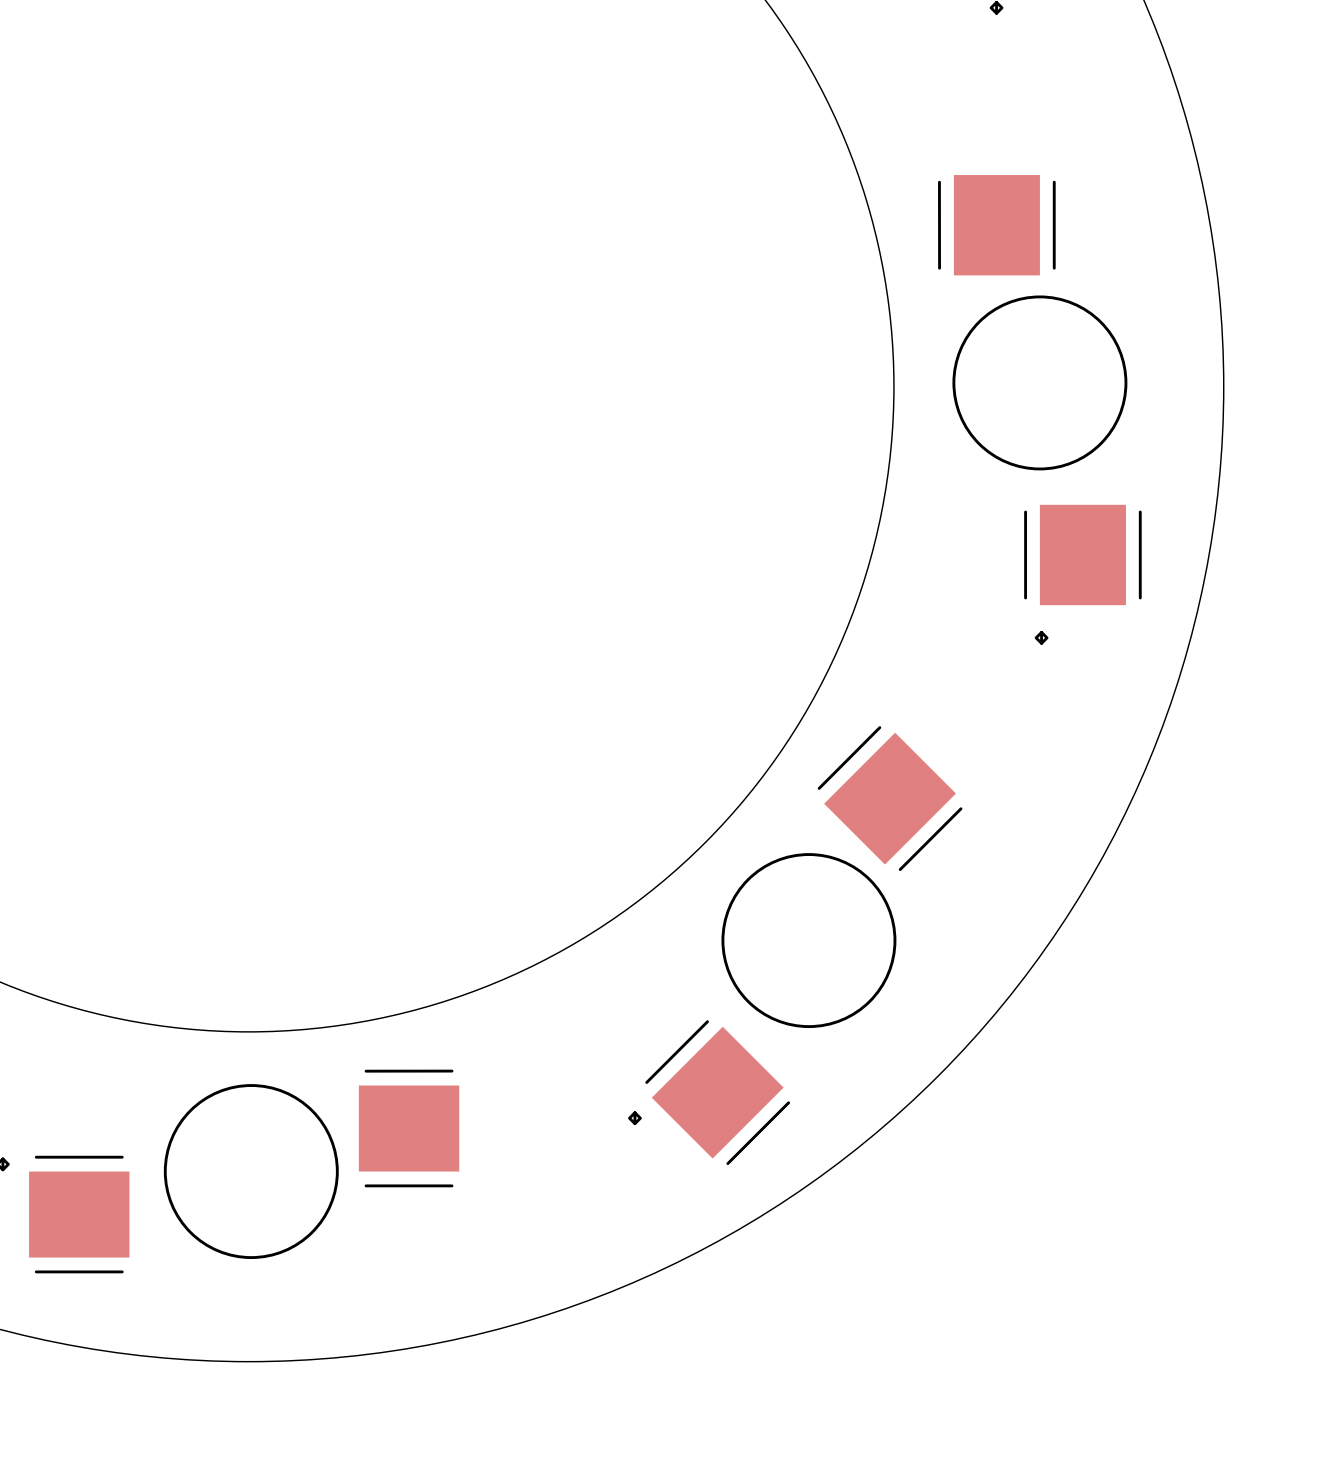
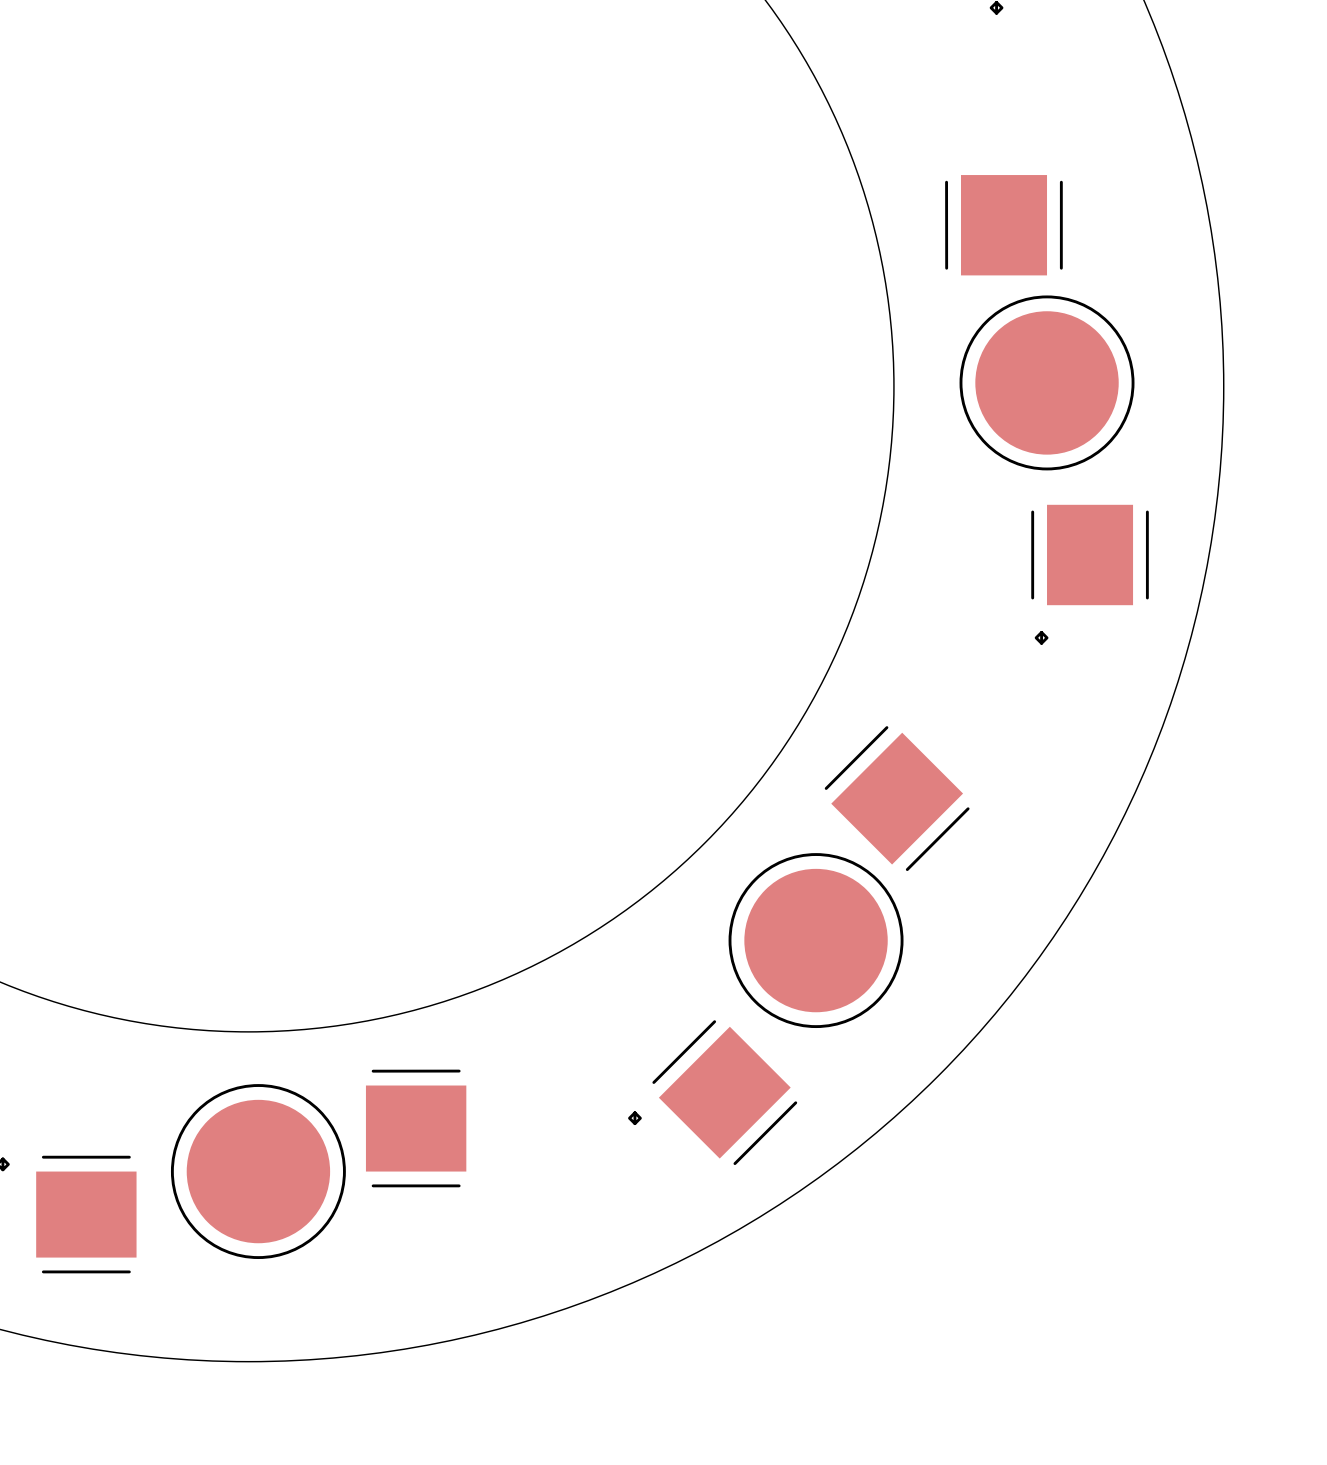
part footprint: [938, 175, 1142, 606] -> [945, 175, 1149, 606]
part footprint: [645, 726, 963, 1166] -> [652, 726, 970, 1166]
part footprint: [29, 1069, 460, 1274] -> [36, 1069, 467, 1274]

